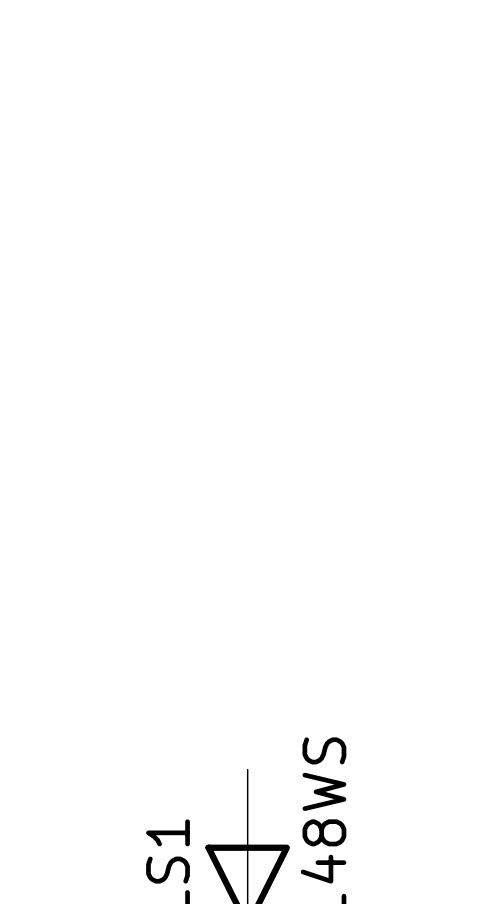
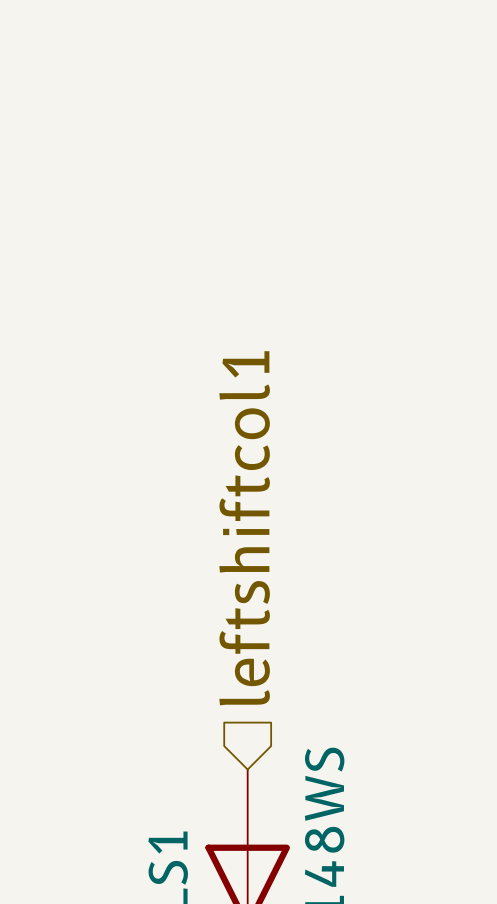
hierarchical label: none -> leftshiftcol1 (244, 528)

